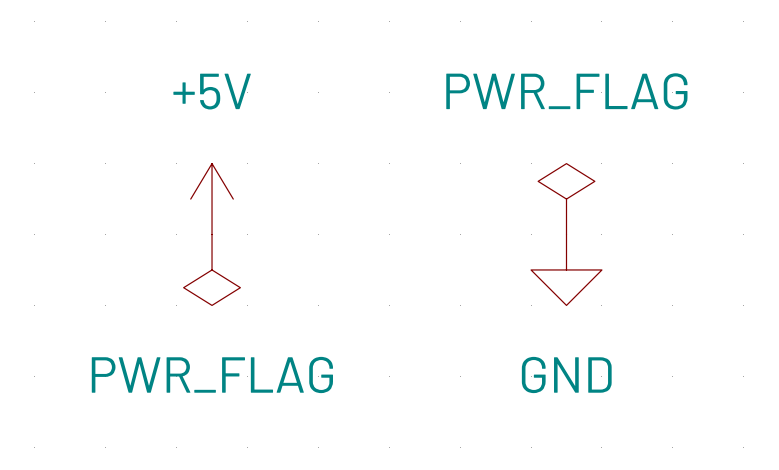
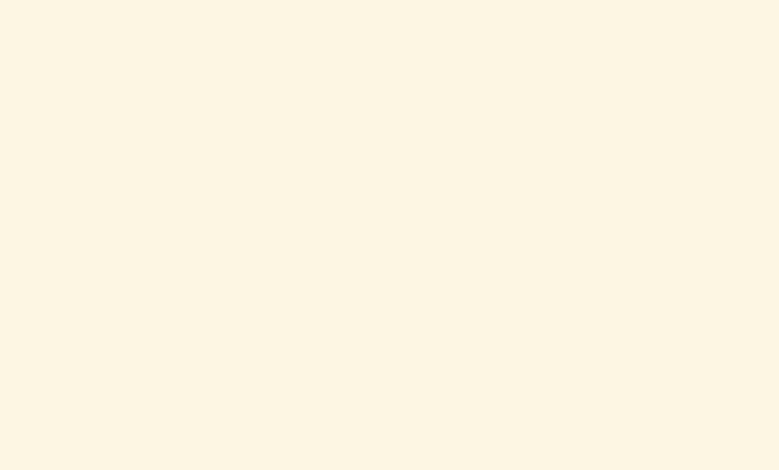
power symbol: +5V (212, 199) -> none
power symbol: PWR_FLAG (566, 199) -> none
power symbol: PWR_FLAG (212, 269) -> none
power symbol: GND (566, 269) -> none

